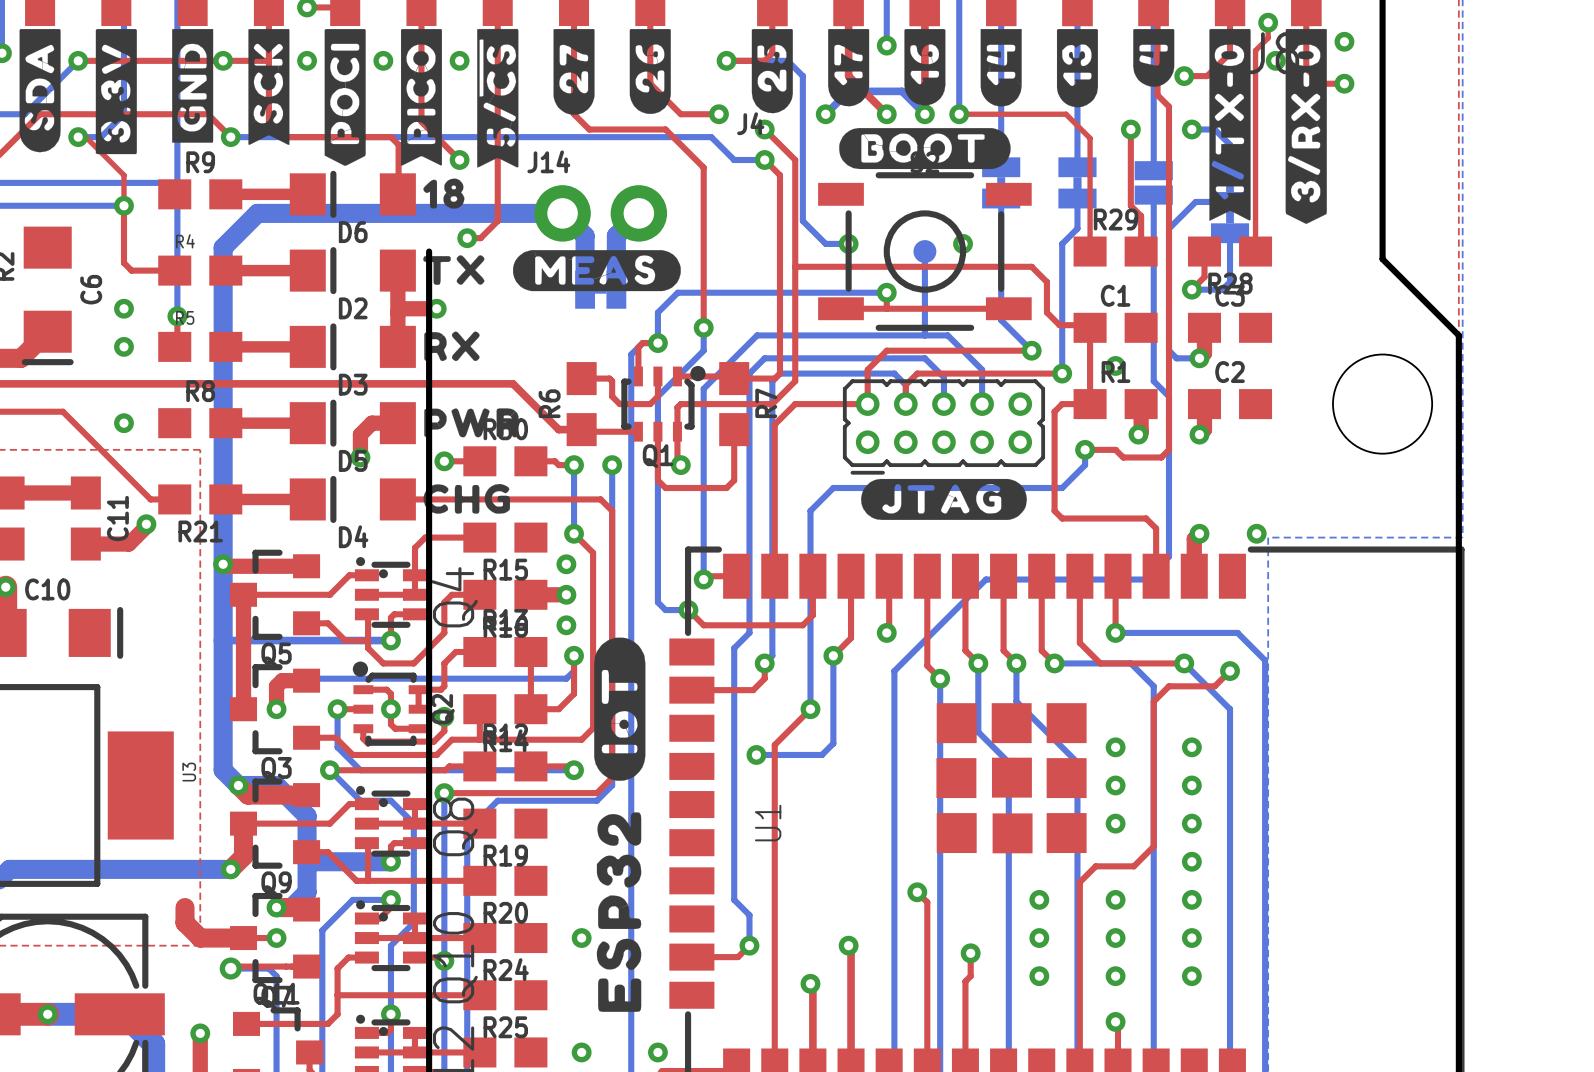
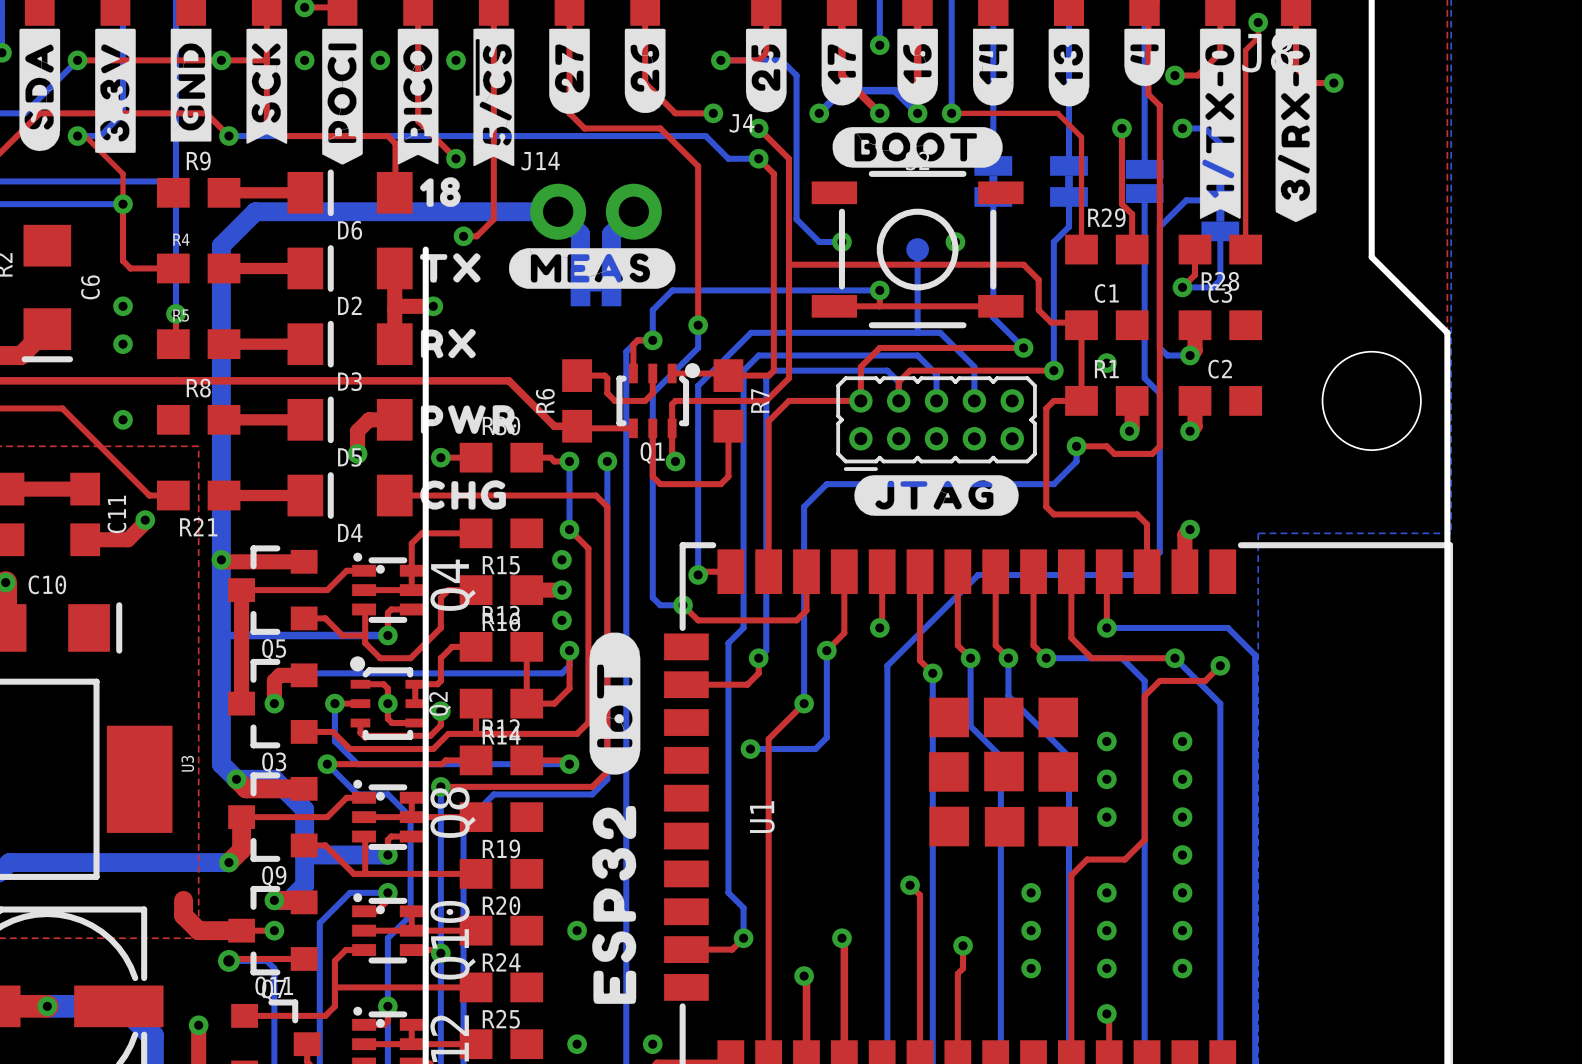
via: (1344, 41) -> none
via: (1275, 60) -> none
via: (1256, 533) -> none

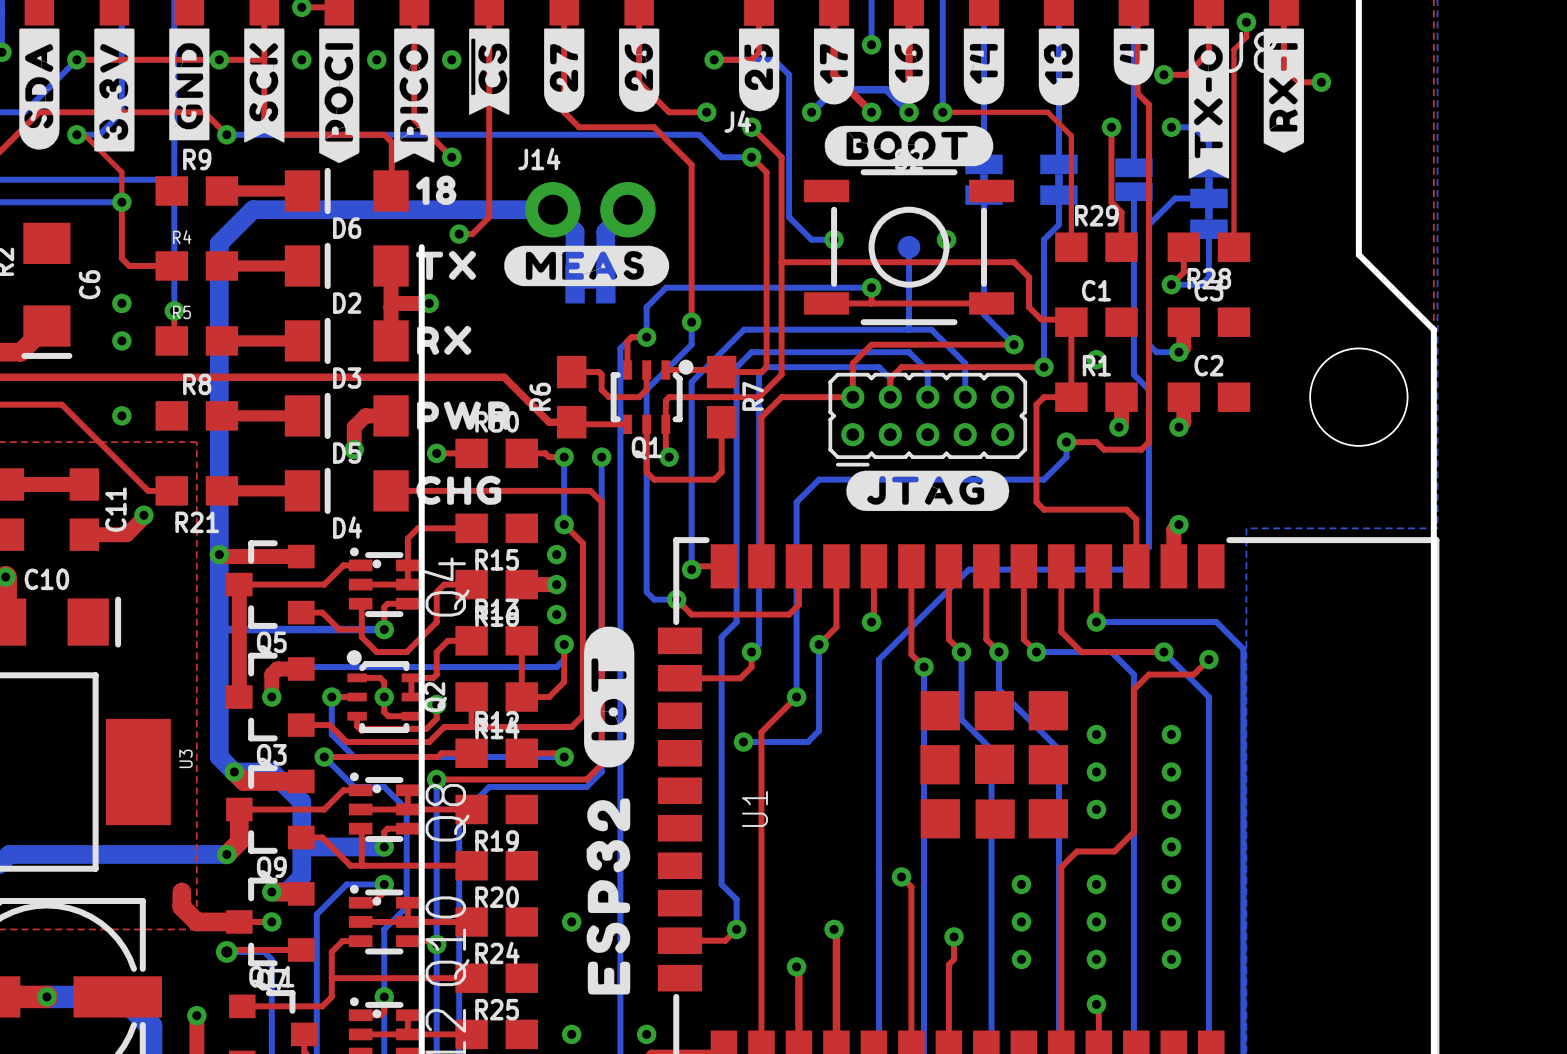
drawing shape: [473, 28, 515, 167] -> [469, 28, 510, 116]
drawing shape: [1199, 28, 1241, 220] -> [1188, 28, 1230, 179]
drawing: [1275, 28, 1317, 223] -> none
drawing: none -> [1263, 28, 1305, 153]

